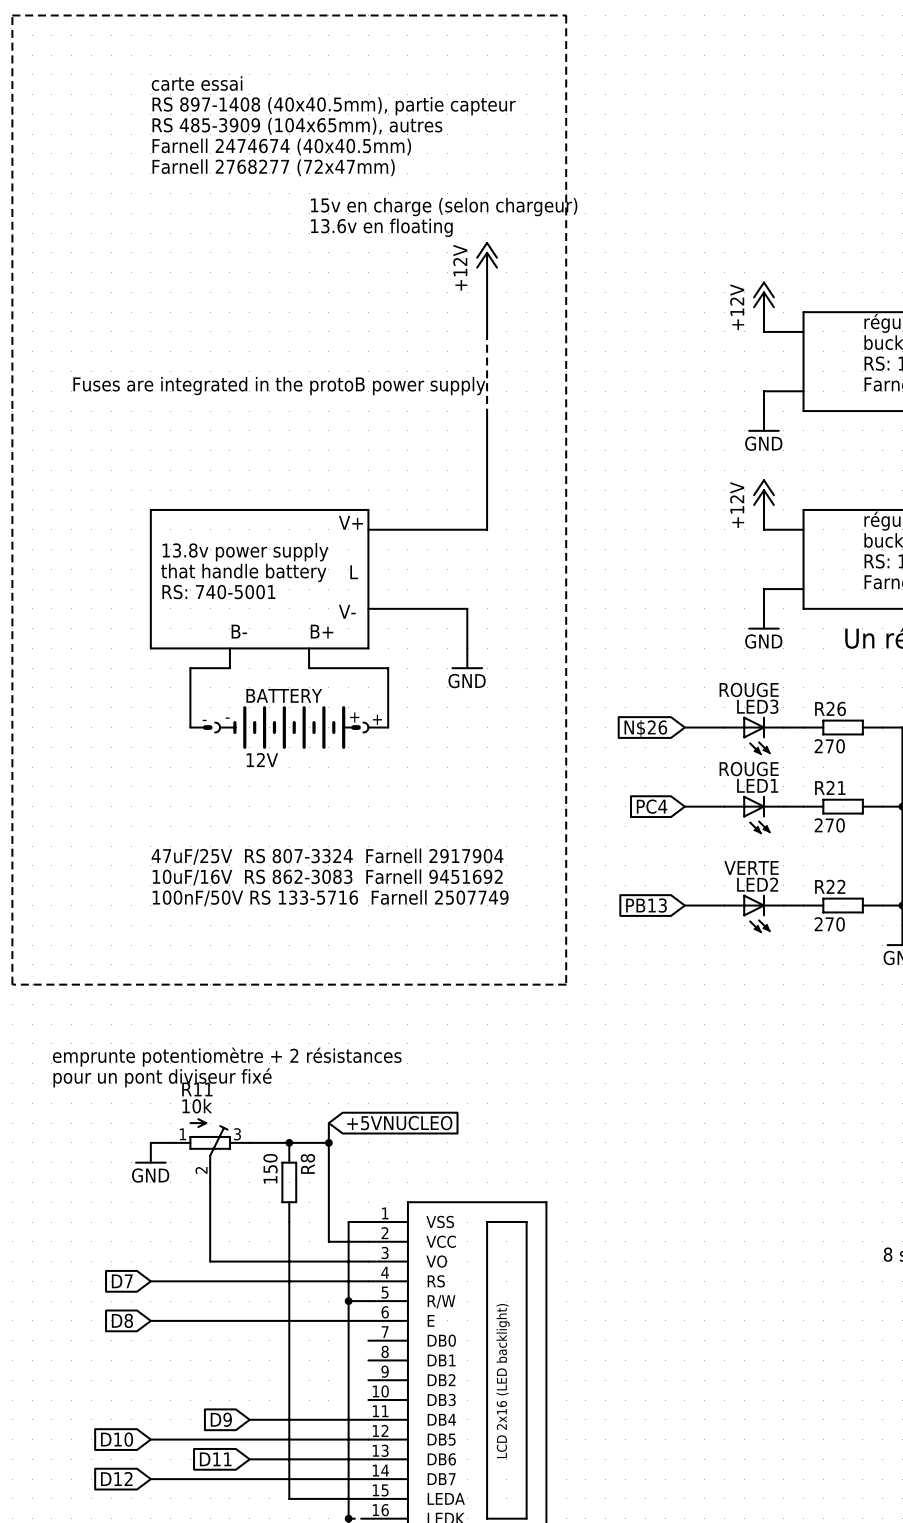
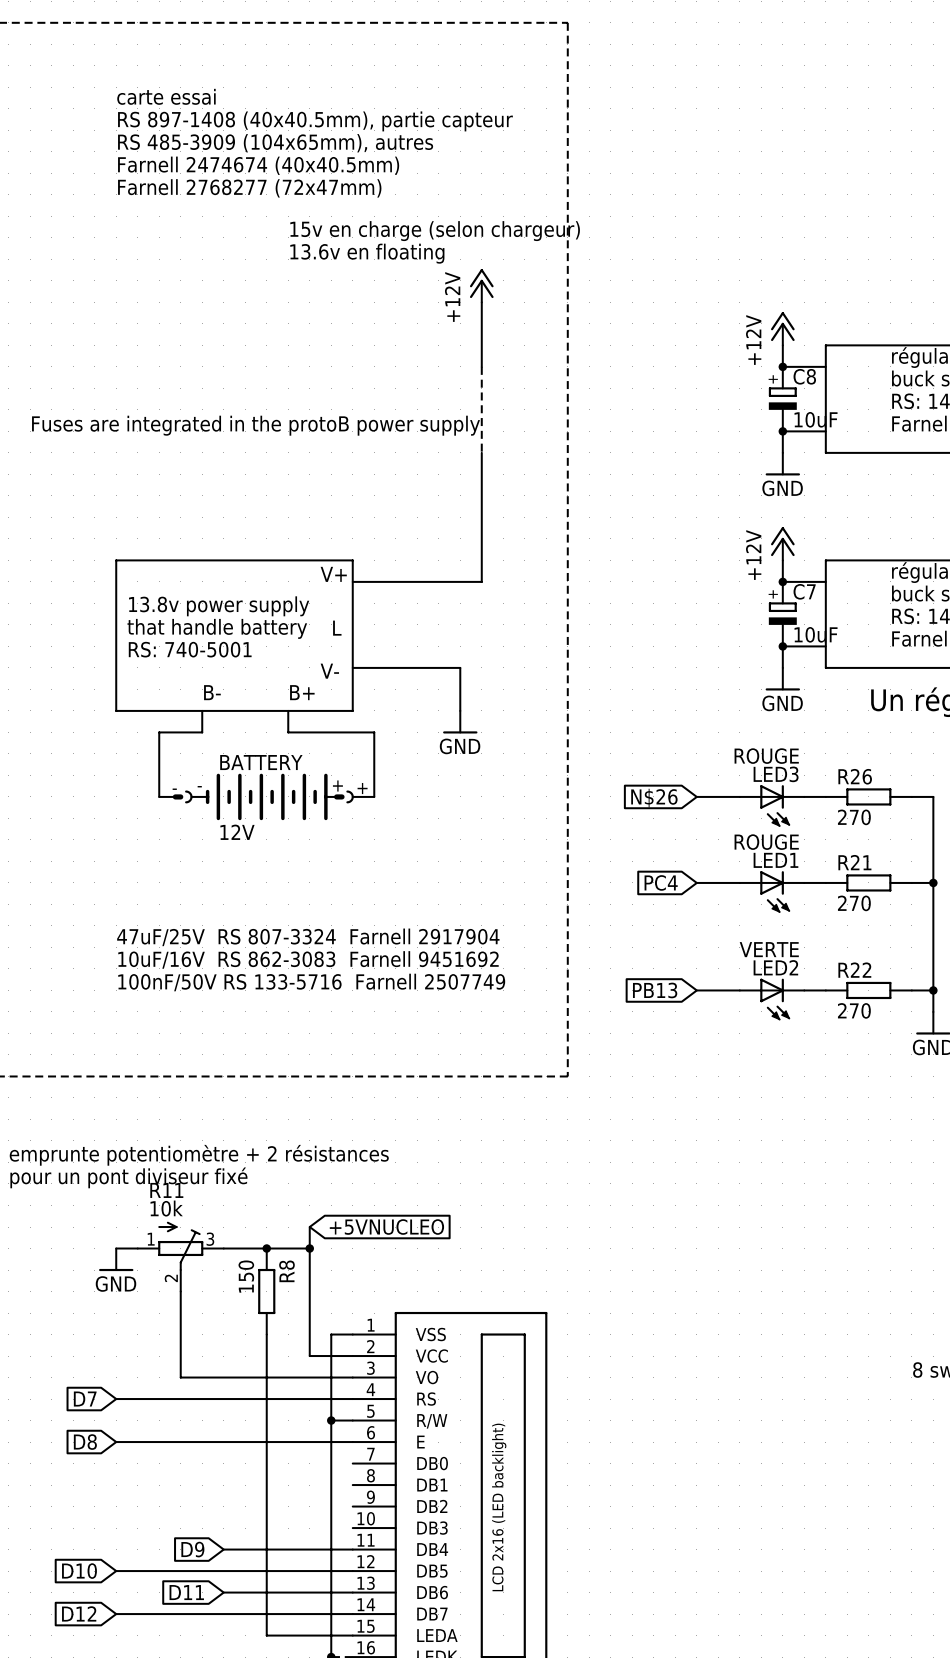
junction: none -> (782, 366)
C8: none -> 10uF (782, 399)
junction: none -> (782, 431)
junction: none -> (782, 581)
C7: none -> 10uF (782, 614)
junction: none -> (782, 646)

